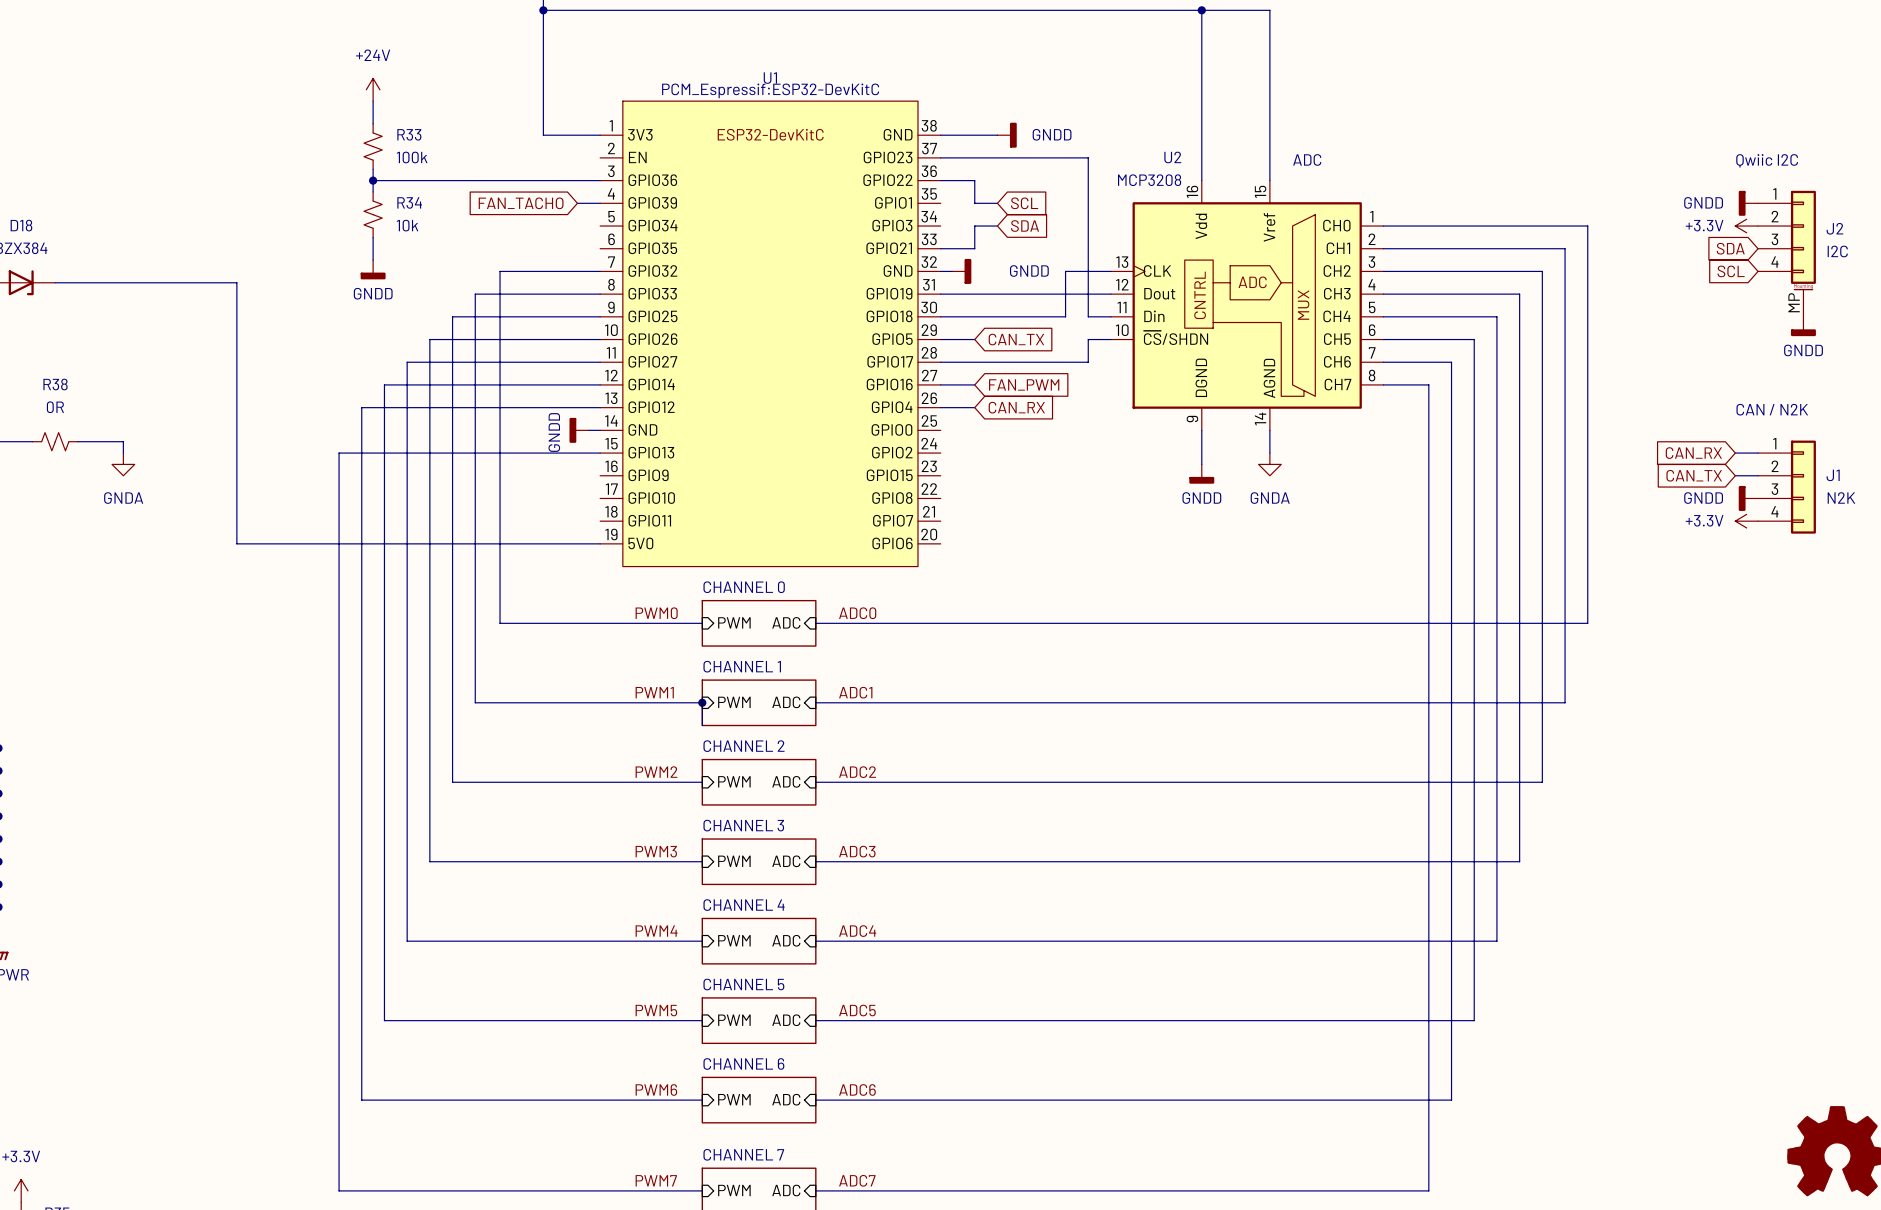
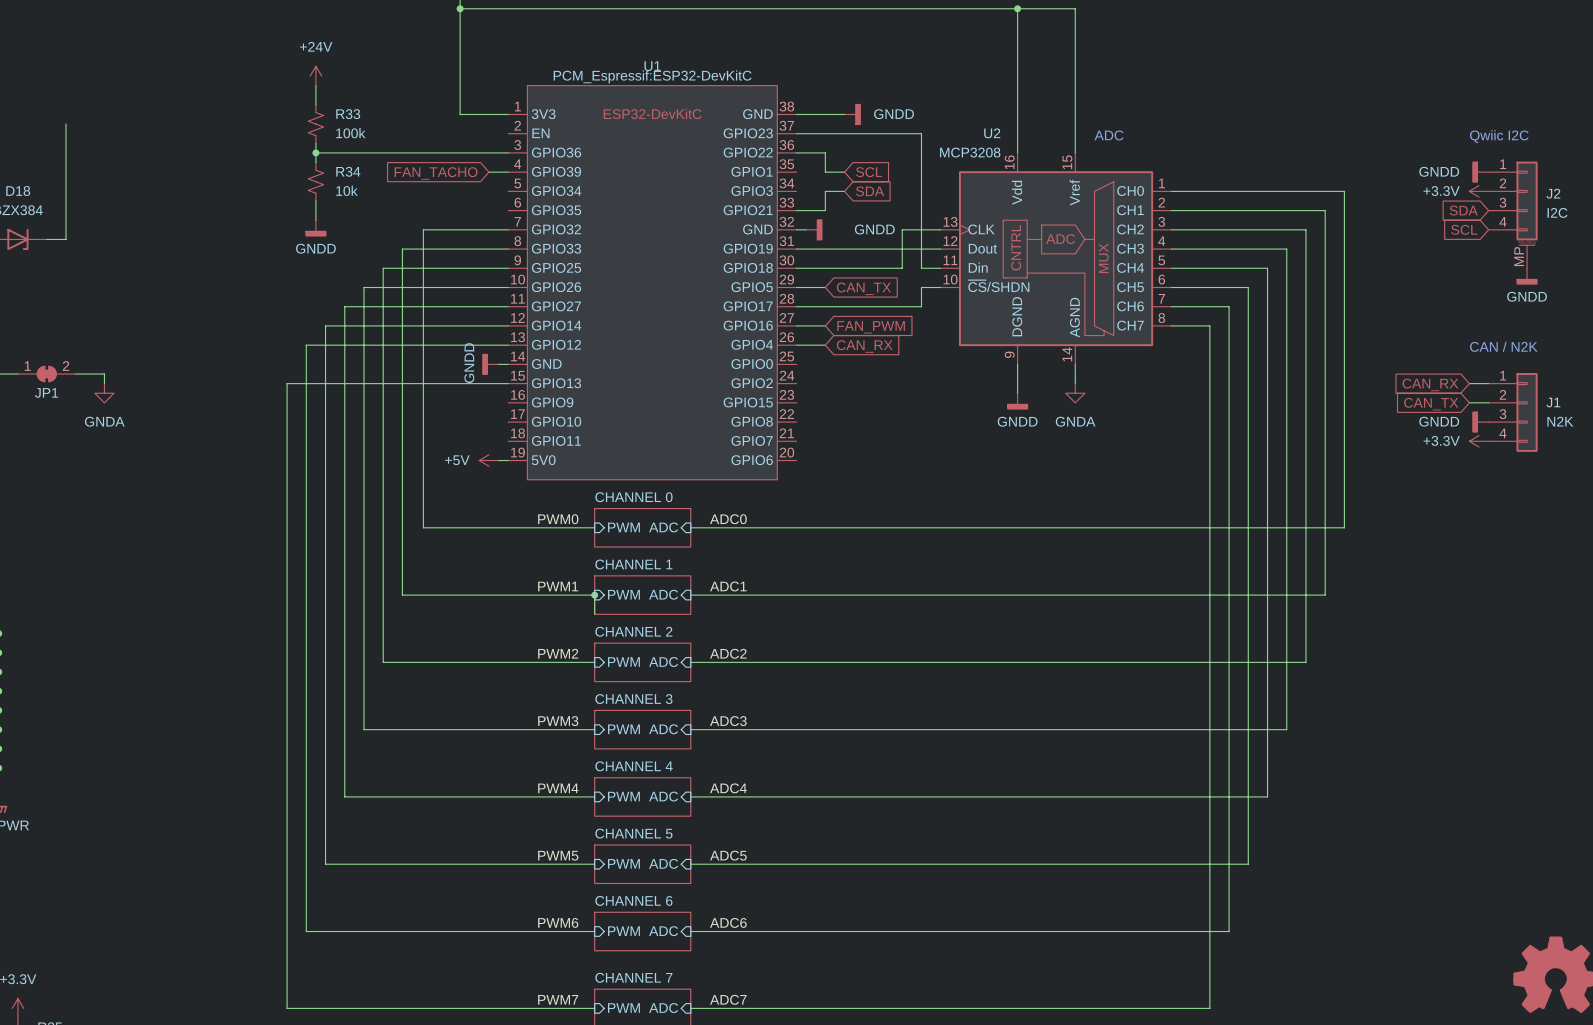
wire: (77, 282) (236, 282) (236, 543) (588, 543) -> (66, 239) (66, 124)
R38: 0R (55, 441) -> none
JP1: none -> (46, 374)
power symbol: none -> +5V (488, 460)

